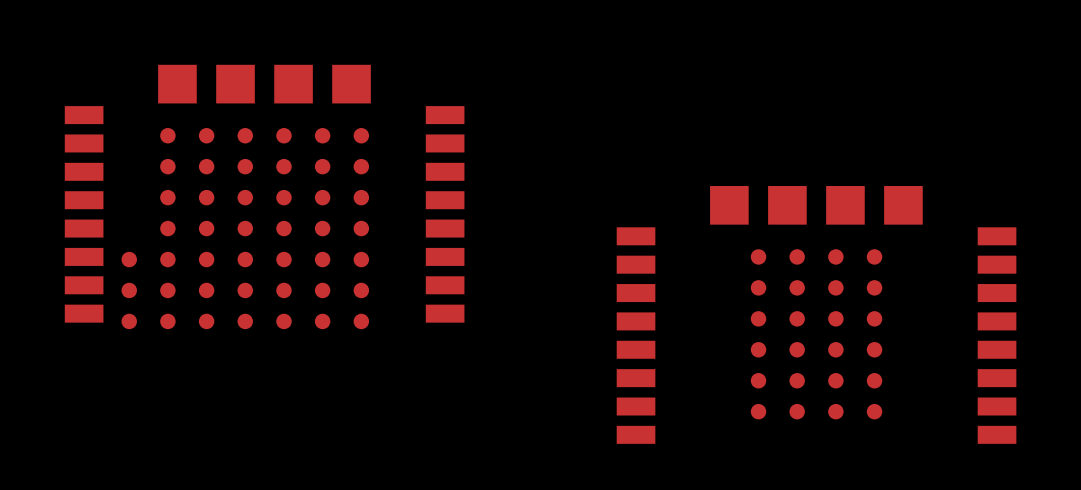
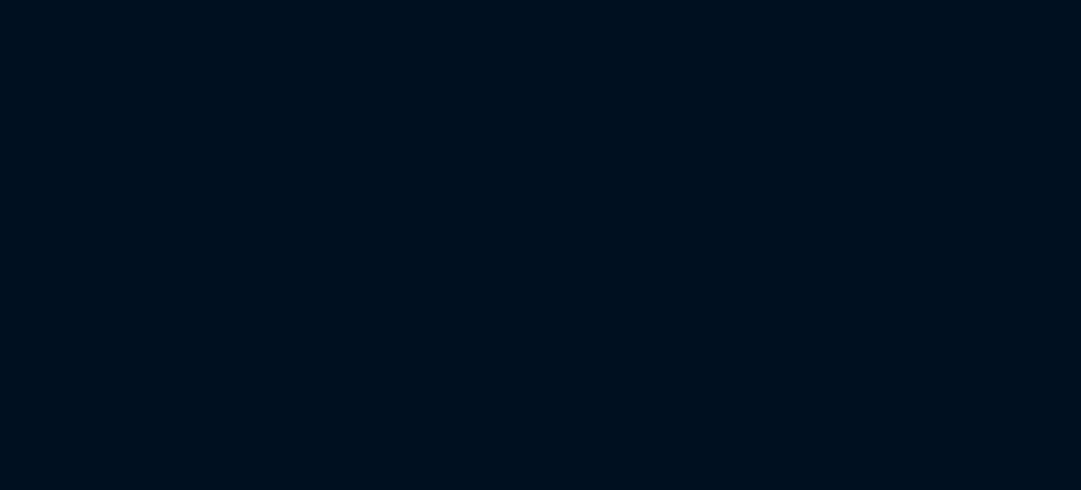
part: (264, 196) -> none
part: (816, 314) -> none

